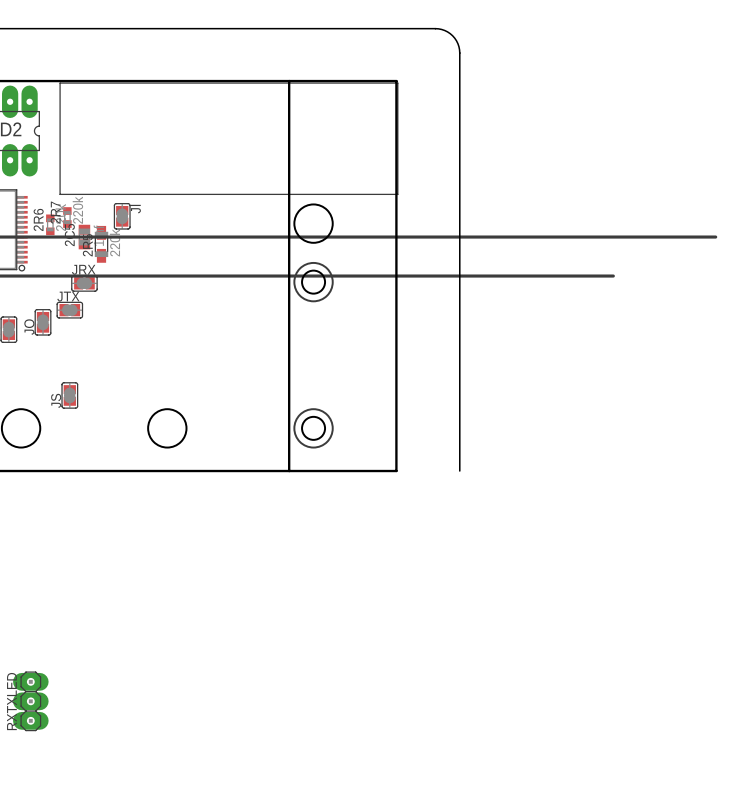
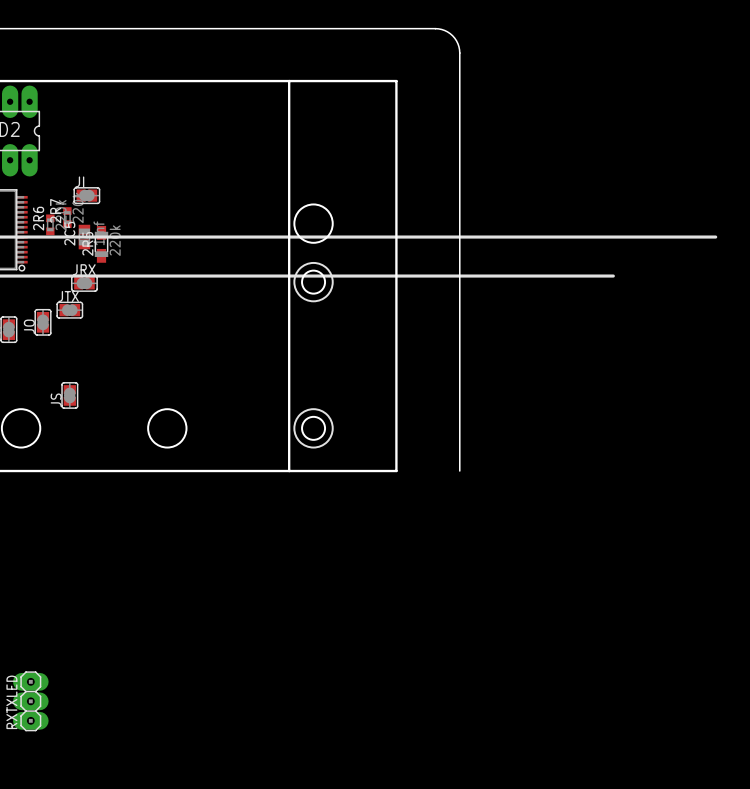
drawing: [59, 82, 399, 195] -> none
JI name position: JI (135, 209) -> JI (79, 181)
JI rotation: 0° (122, 216) -> 90° clockwise (86, 195)
JI position: (122, 216) -> (86, 195)

